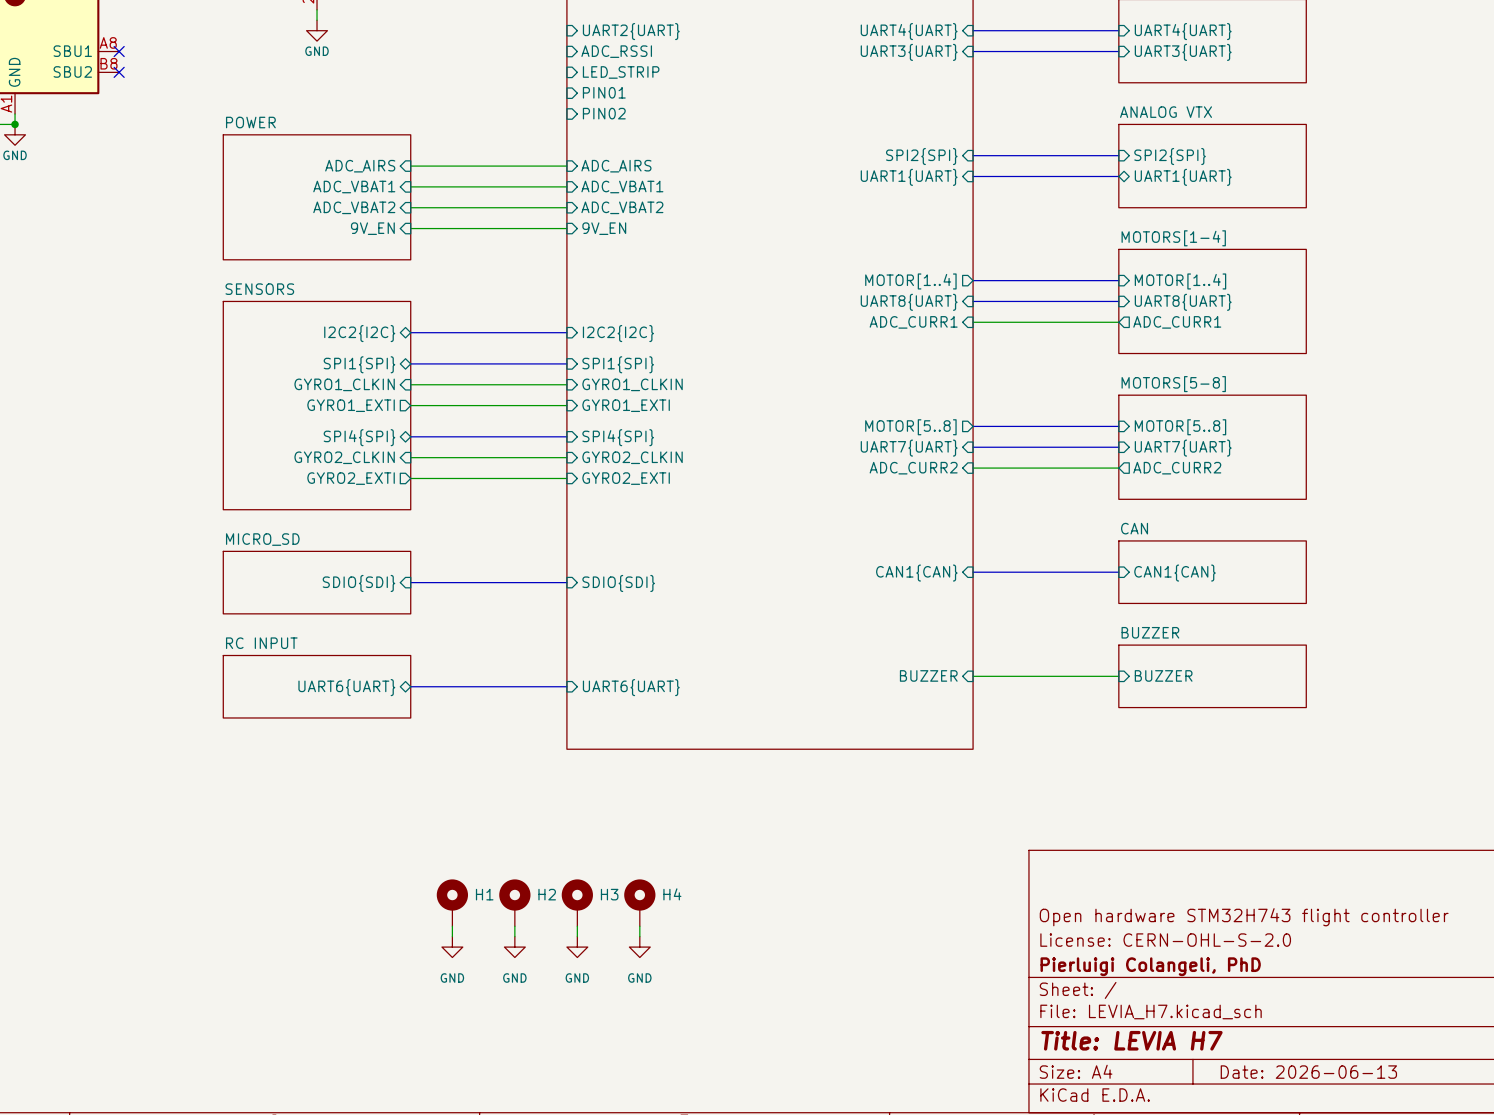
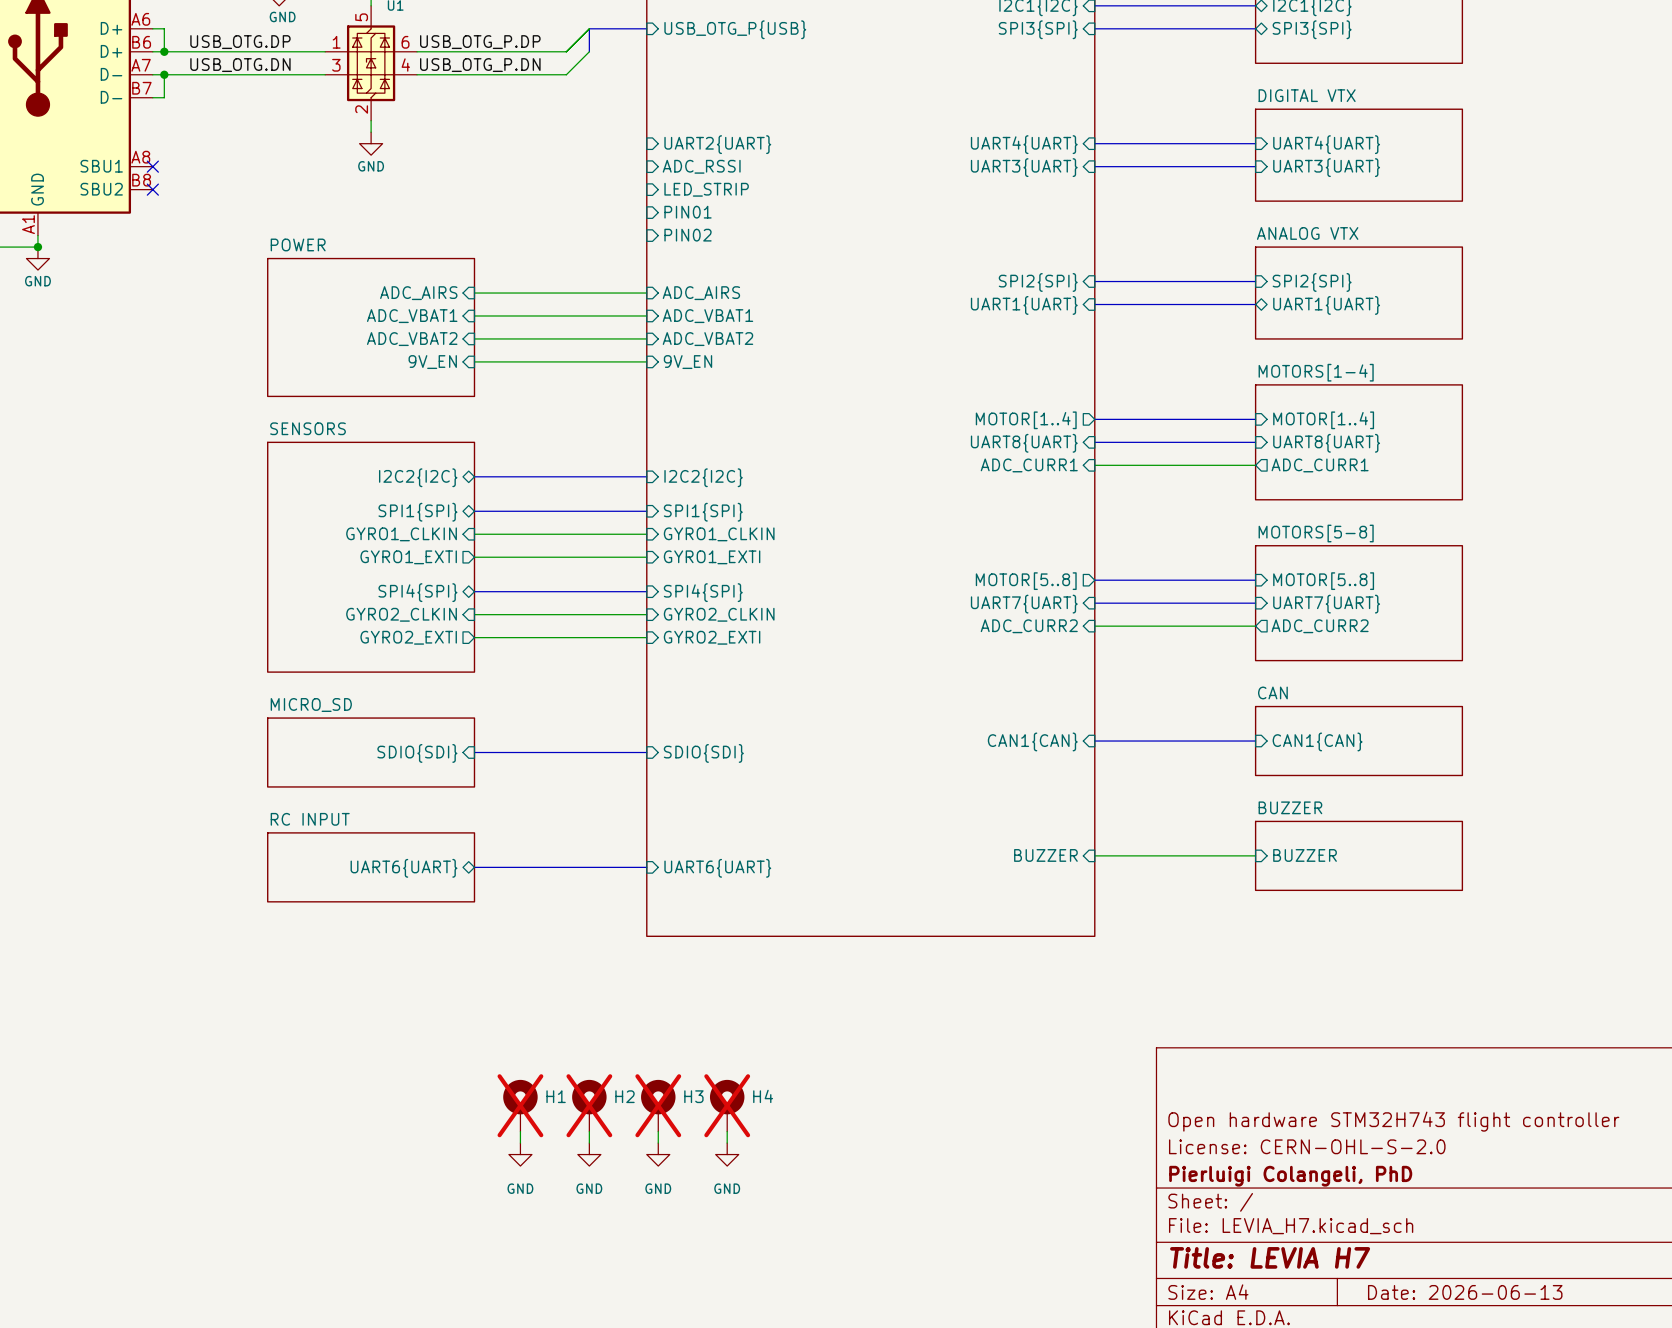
H1 do-not-place cross: none -> (520, 1105)
H2 do-not-place cross: none -> (589, 1105)
H3 do-not-place cross: none -> (658, 1105)
H4 do-not-place cross: none -> (727, 1105)

